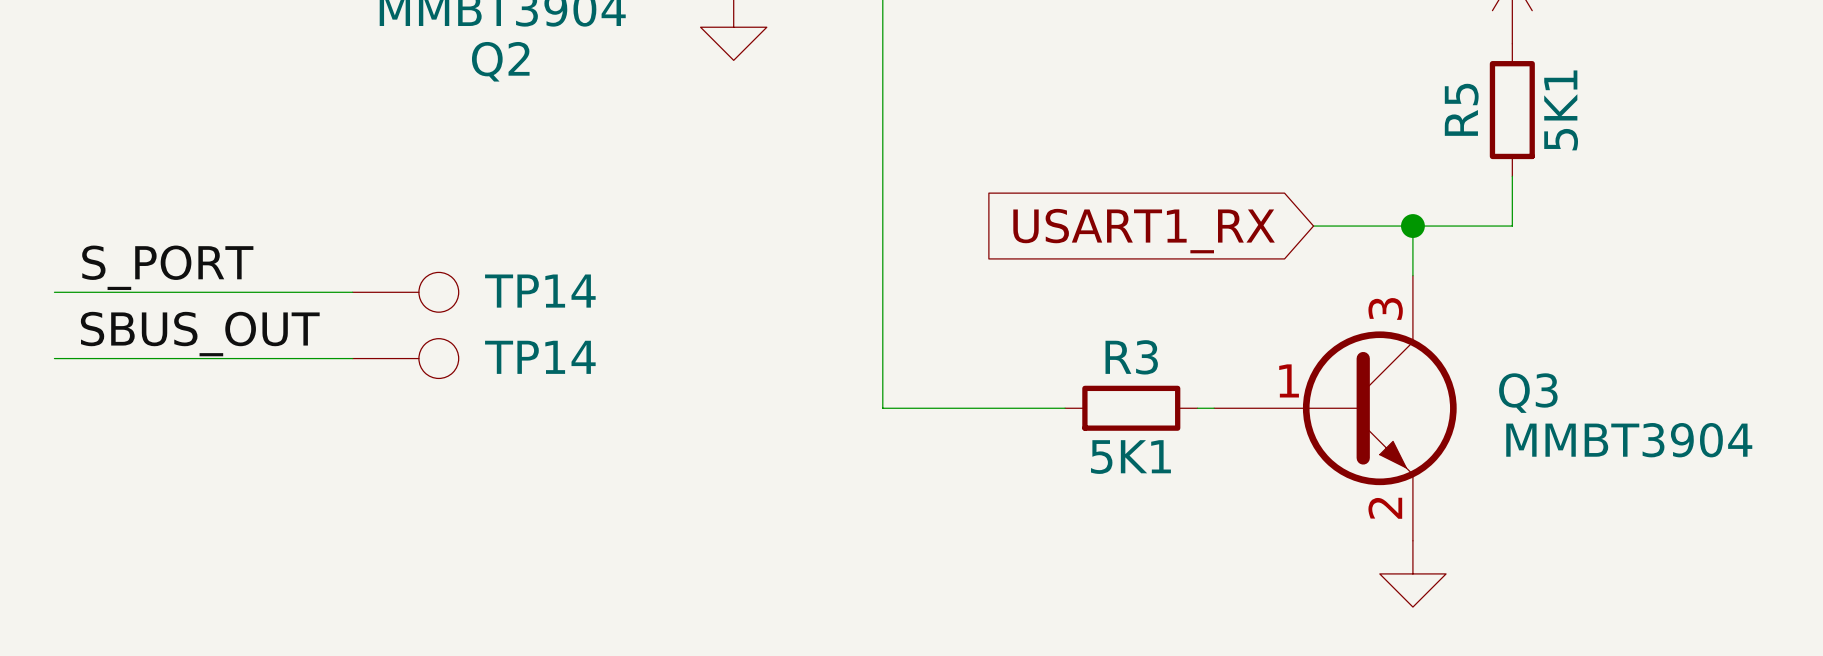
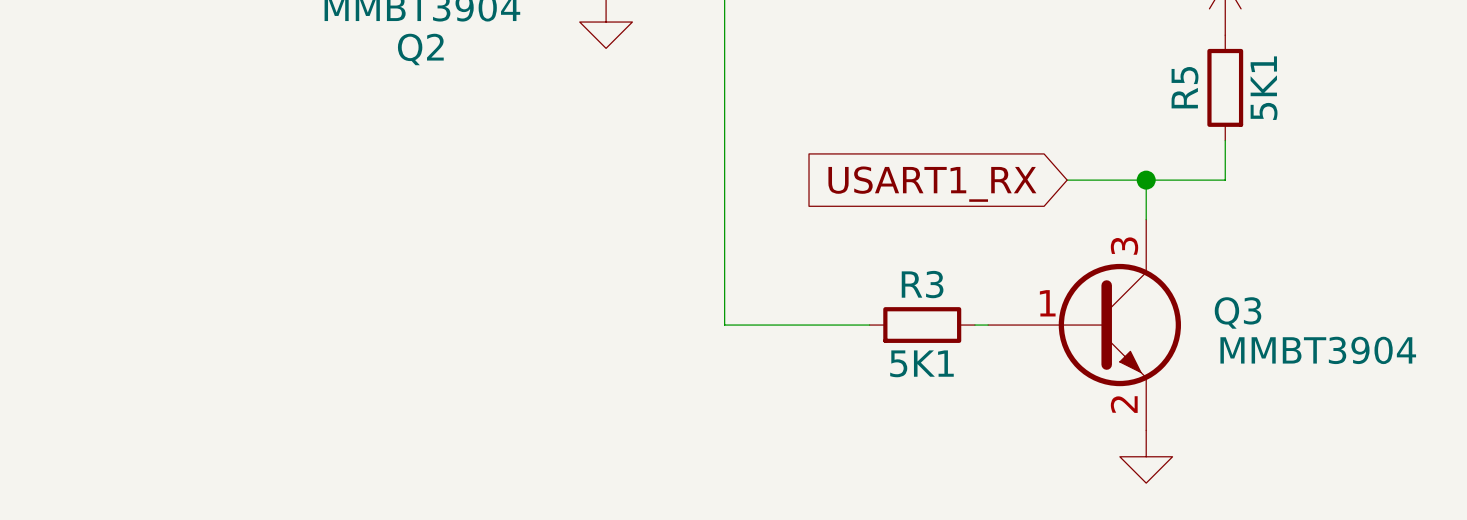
label: S_PORT (167, 267) -> none
wire: (54, 292) (352, 292) -> none
TP14: (405, 292) -> none
label: SBUS_OUT (200, 334) -> none
wire: (54, 358) (352, 358) -> none
TP14: (405, 358) -> none

